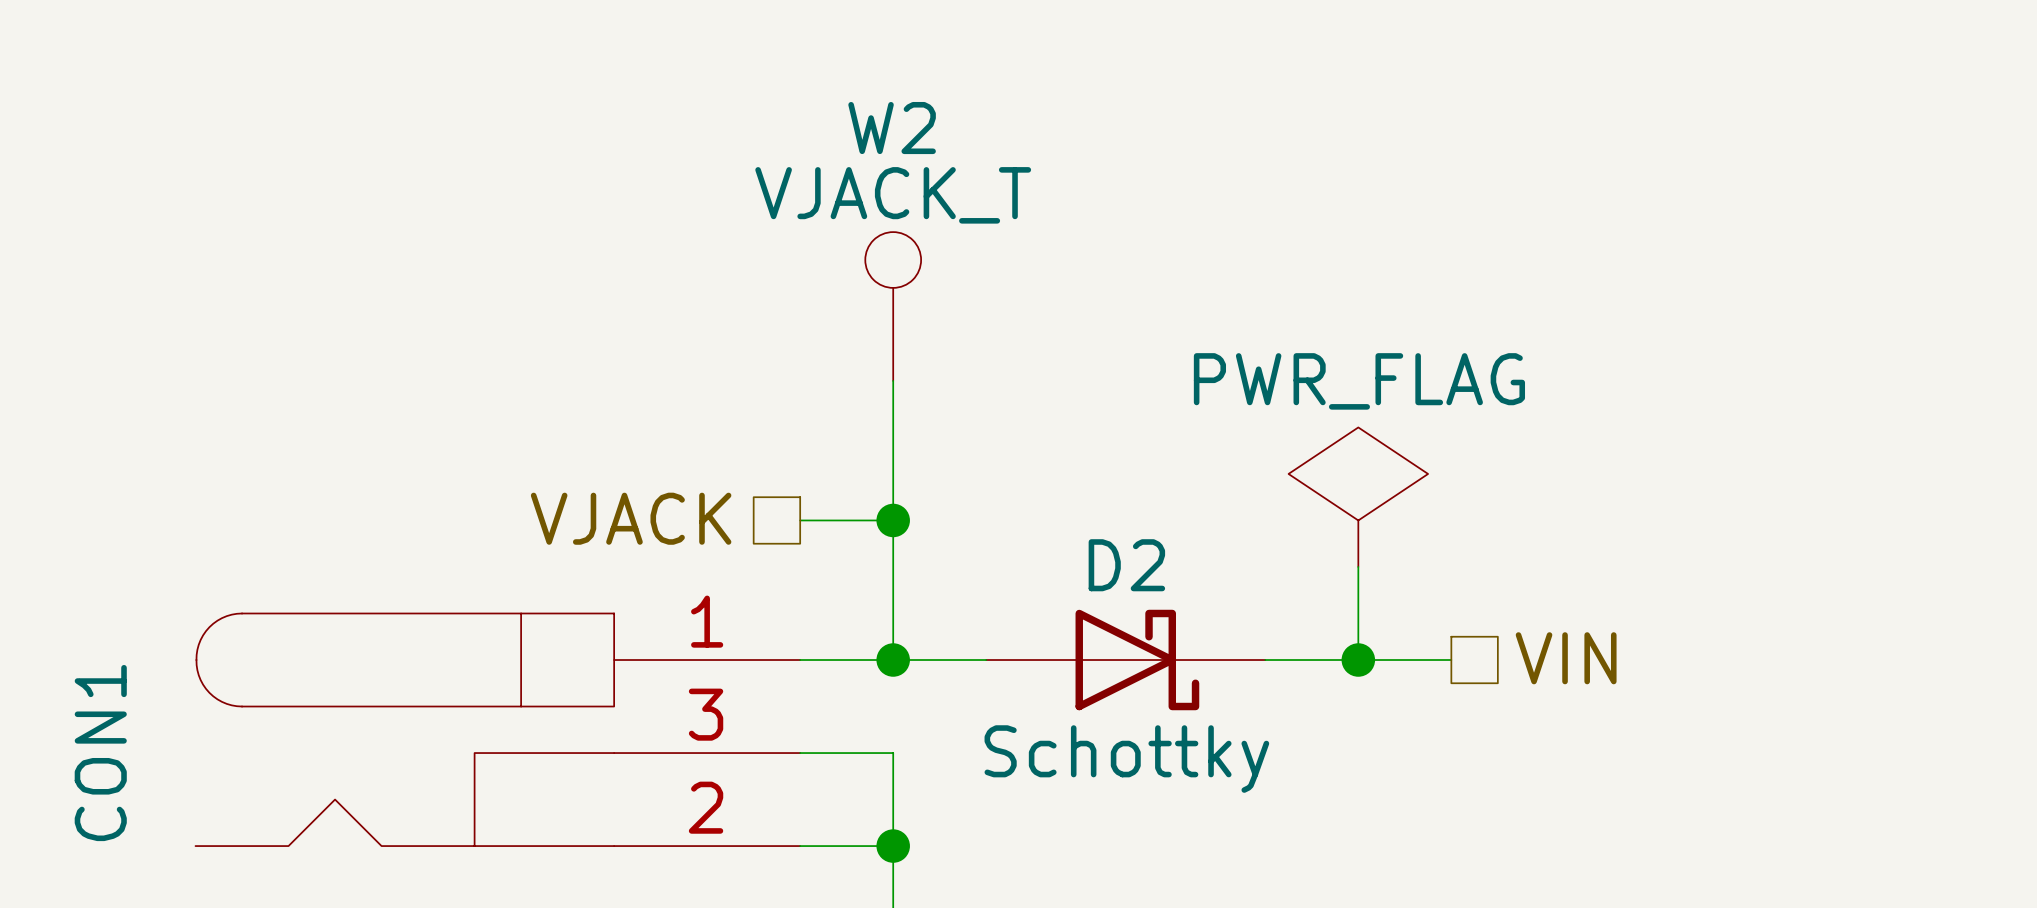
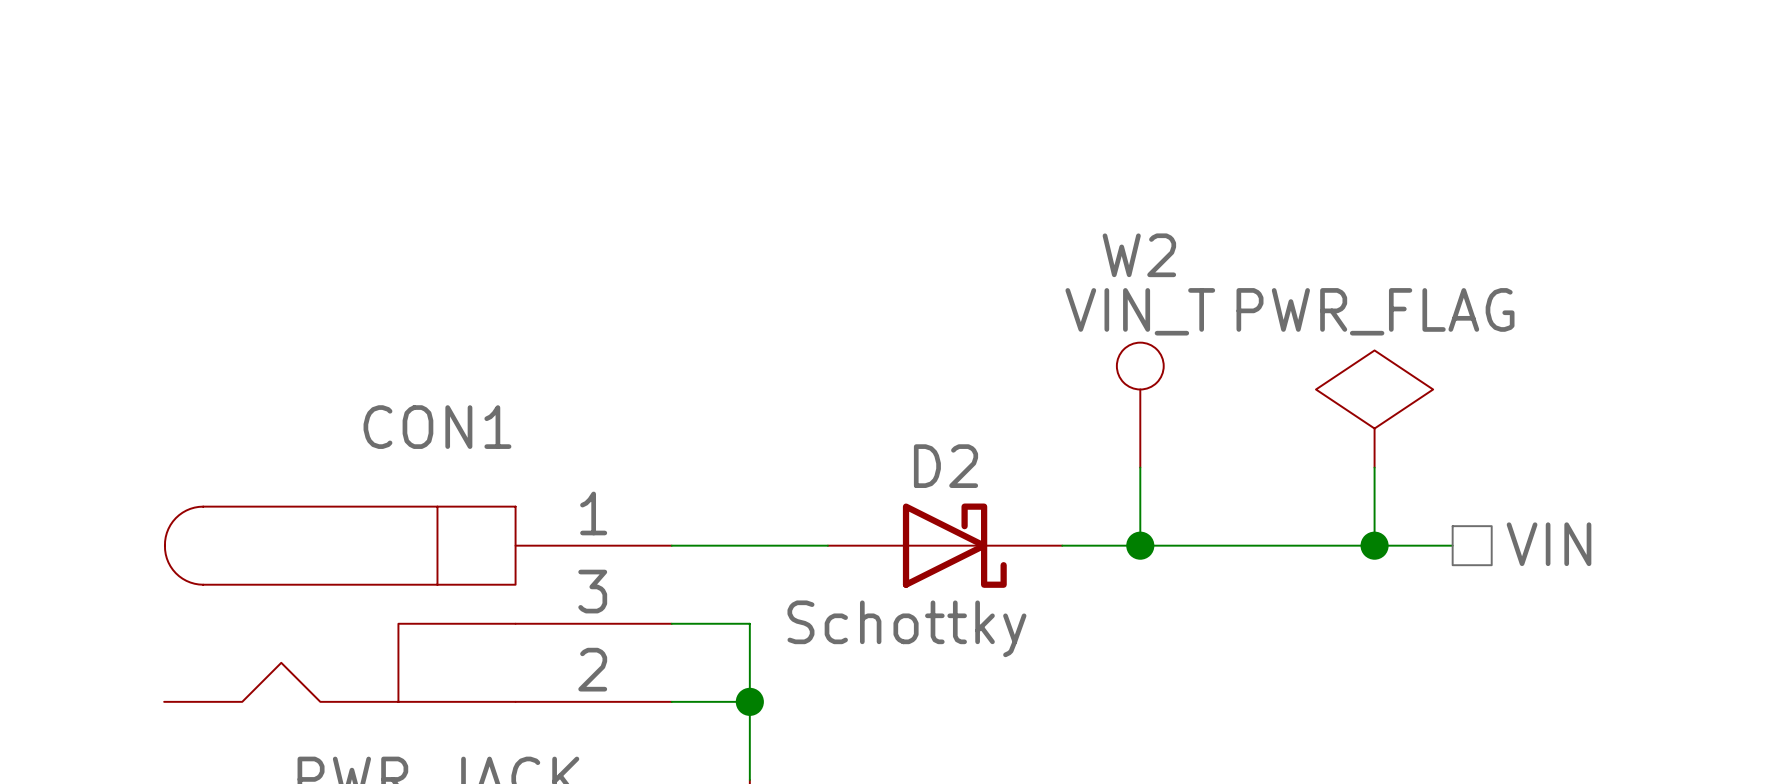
W2 value: VJACK_T (893, 195) -> VIN_T (1140, 311)
W2 position: (893, 306) -> (1140, 405)
wire: (893, 380) (893, 660) -> none
power symbol position: PWR_FLAG (1358, 497) -> PWR_FLAG (1374, 409)
hierarchical label: VJACK (631, 518) -> none
wire: (800, 520) (893, 520) -> none
junction: (893, 520) -> none
wire: none -> (1374, 467) (1374, 545)
hierarchical label position: VIN (1566, 658) -> VIN (1549, 544)
junction: (893, 660) -> none
wire: none -> (1218, 545) (1452, 545)
junction: none -> (1374, 545)
CON1 name rotation: 0° (100, 753) -> 90° clockwise (437, 427)
CON1 name position: CON1 (100, 753) -> CON1 (437, 427)
D2 value position: Schottky (1126, 759) -> Schottky (906, 628)

